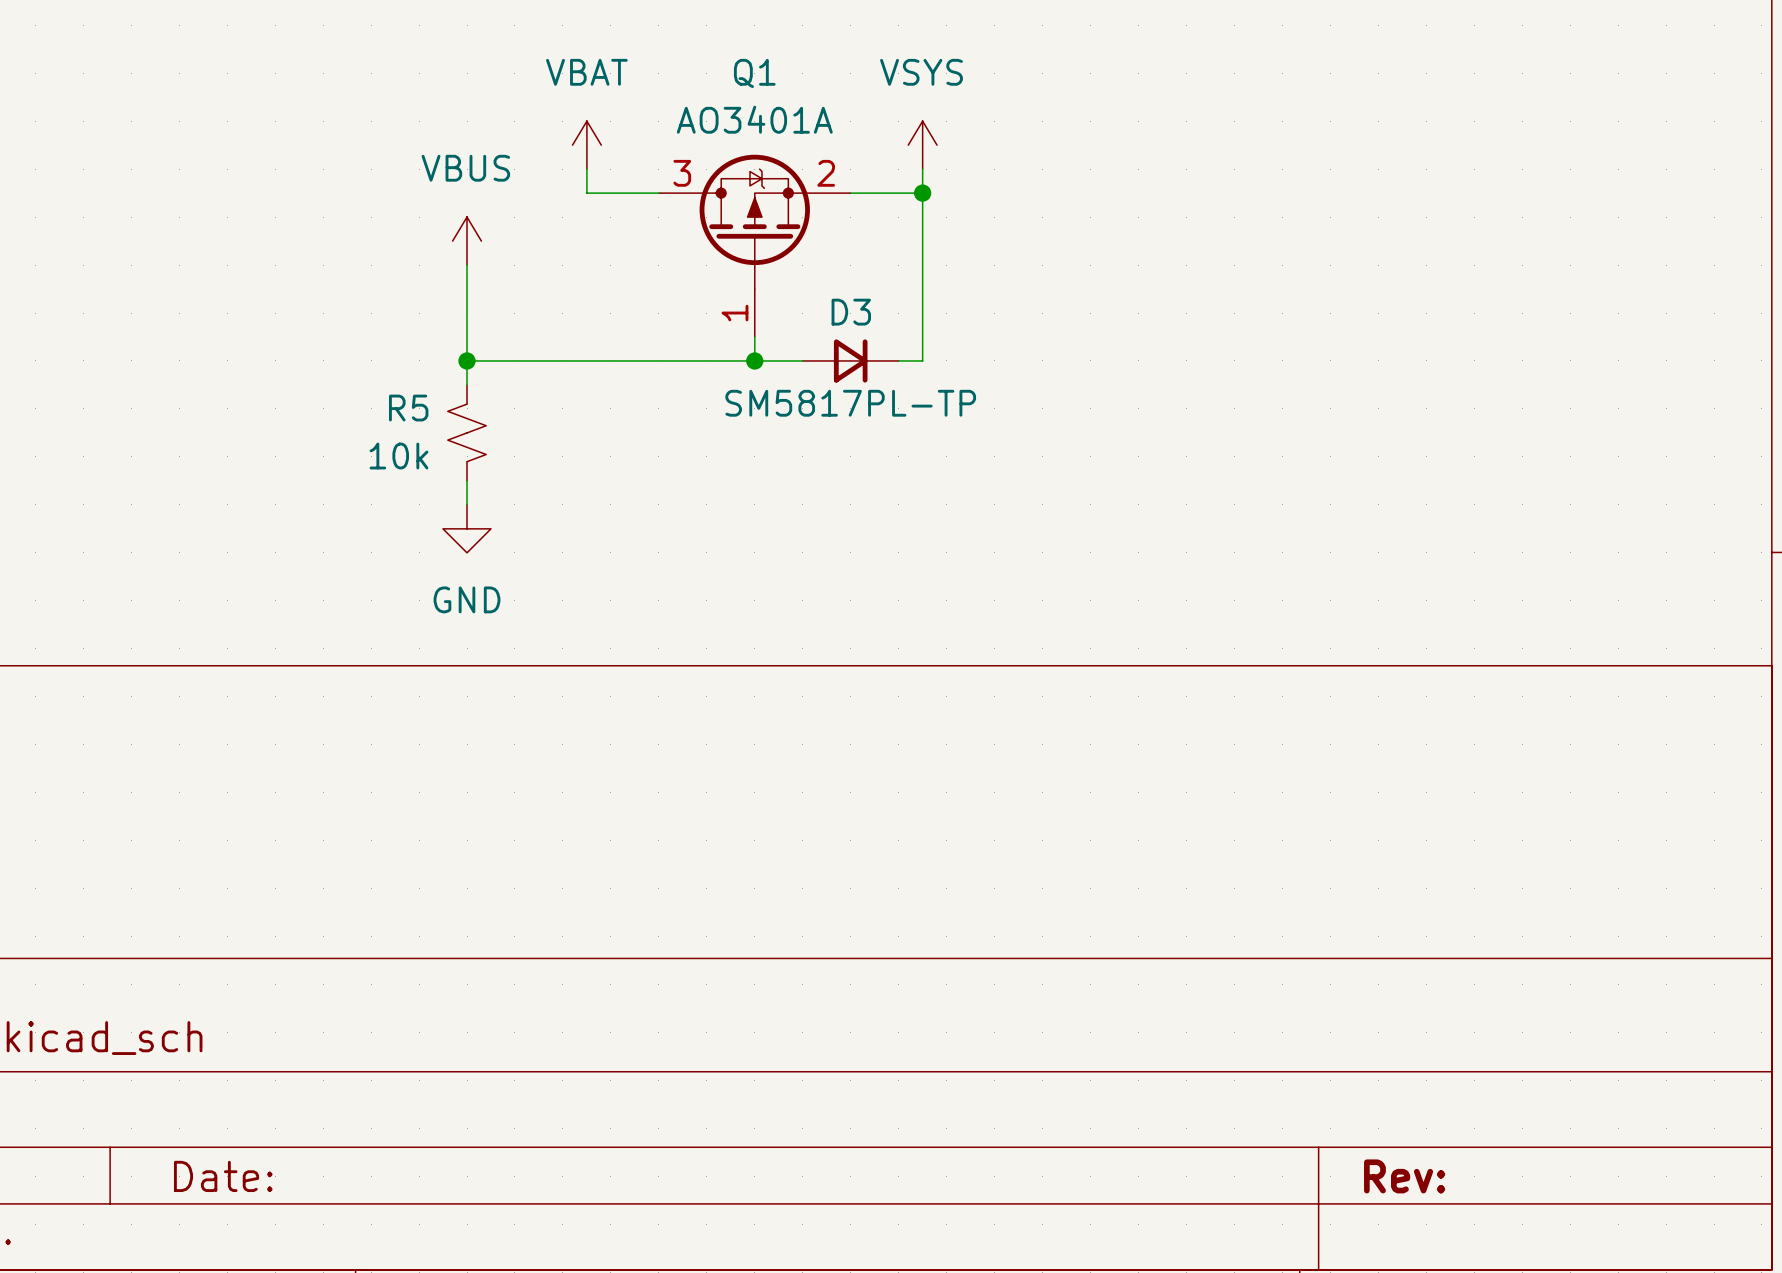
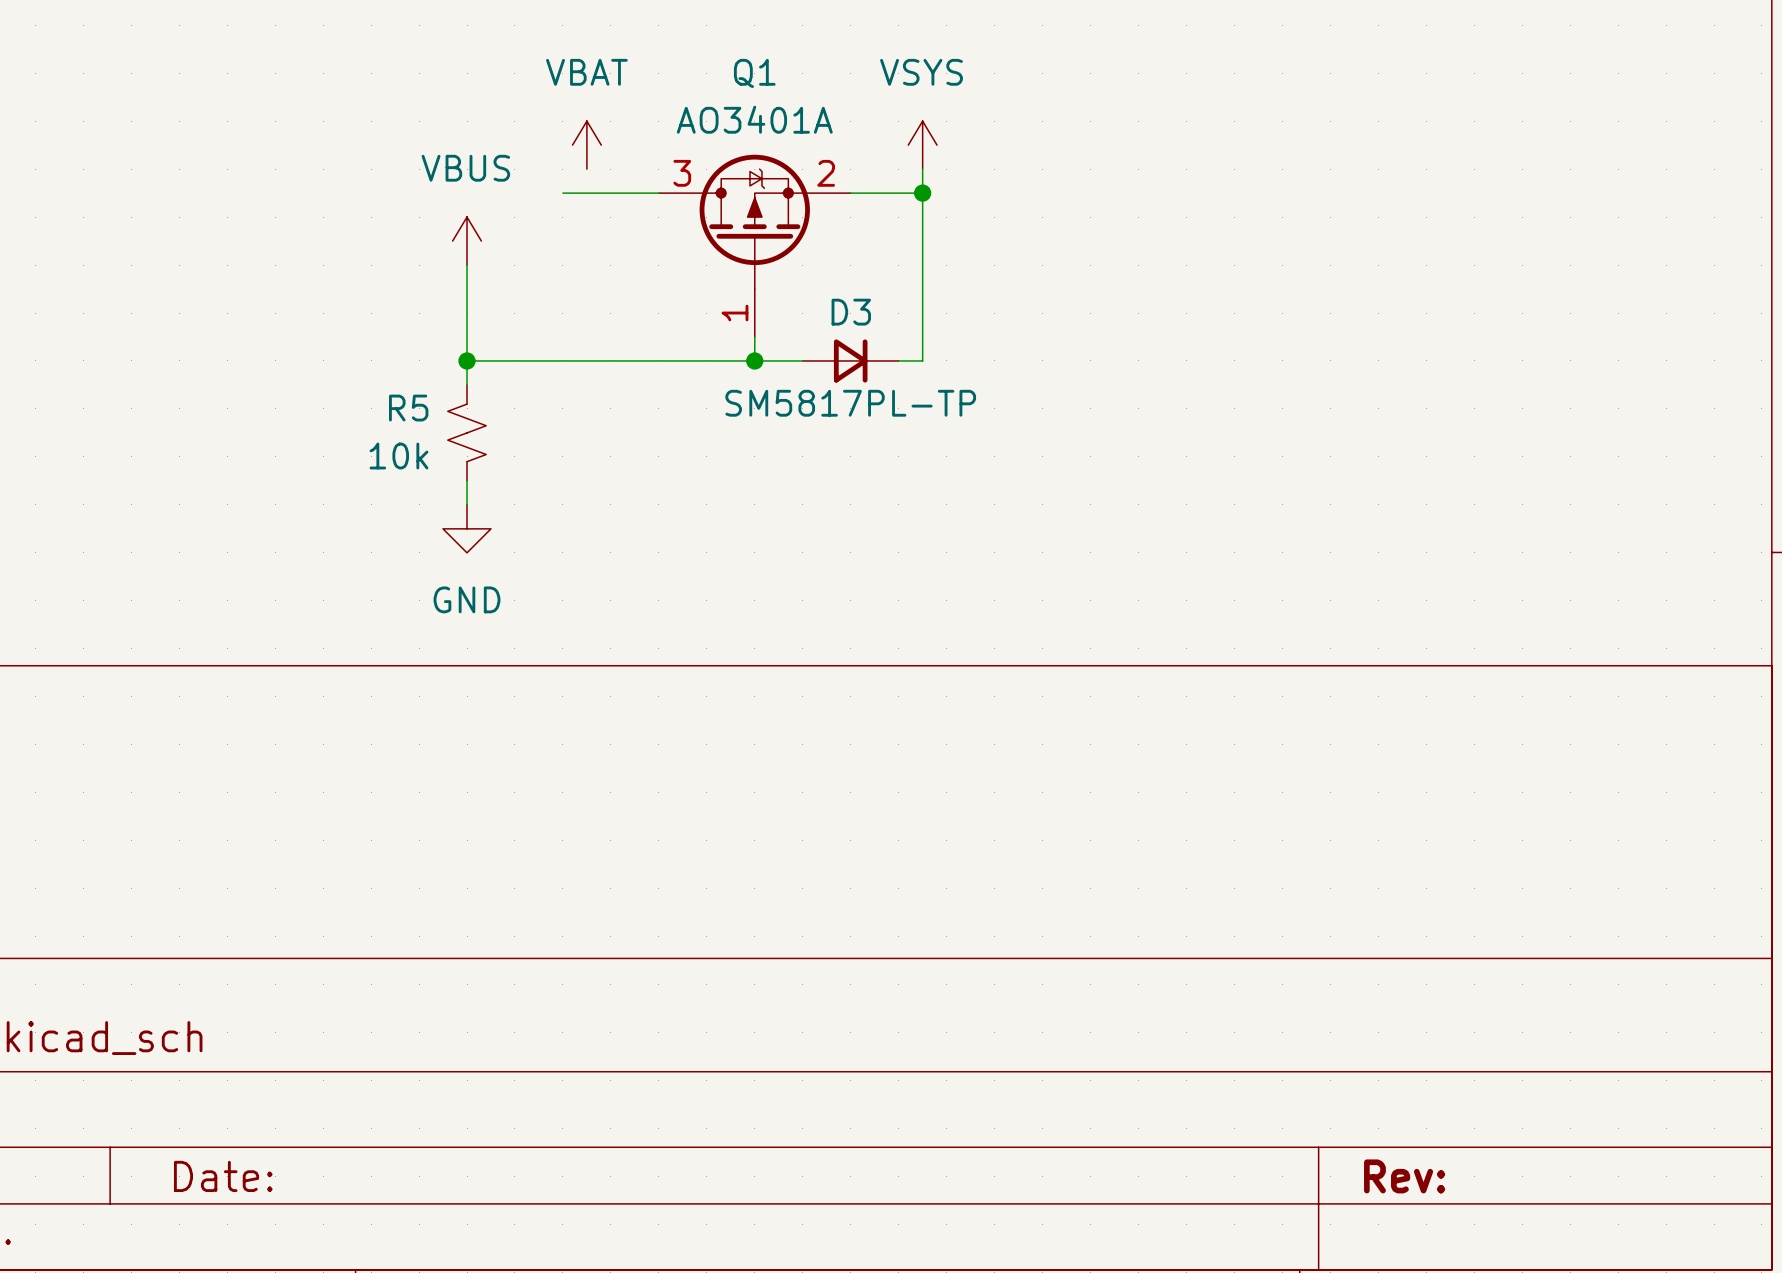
wire: (586, 169) (586, 193) -> (562, 193) (586, 193)

